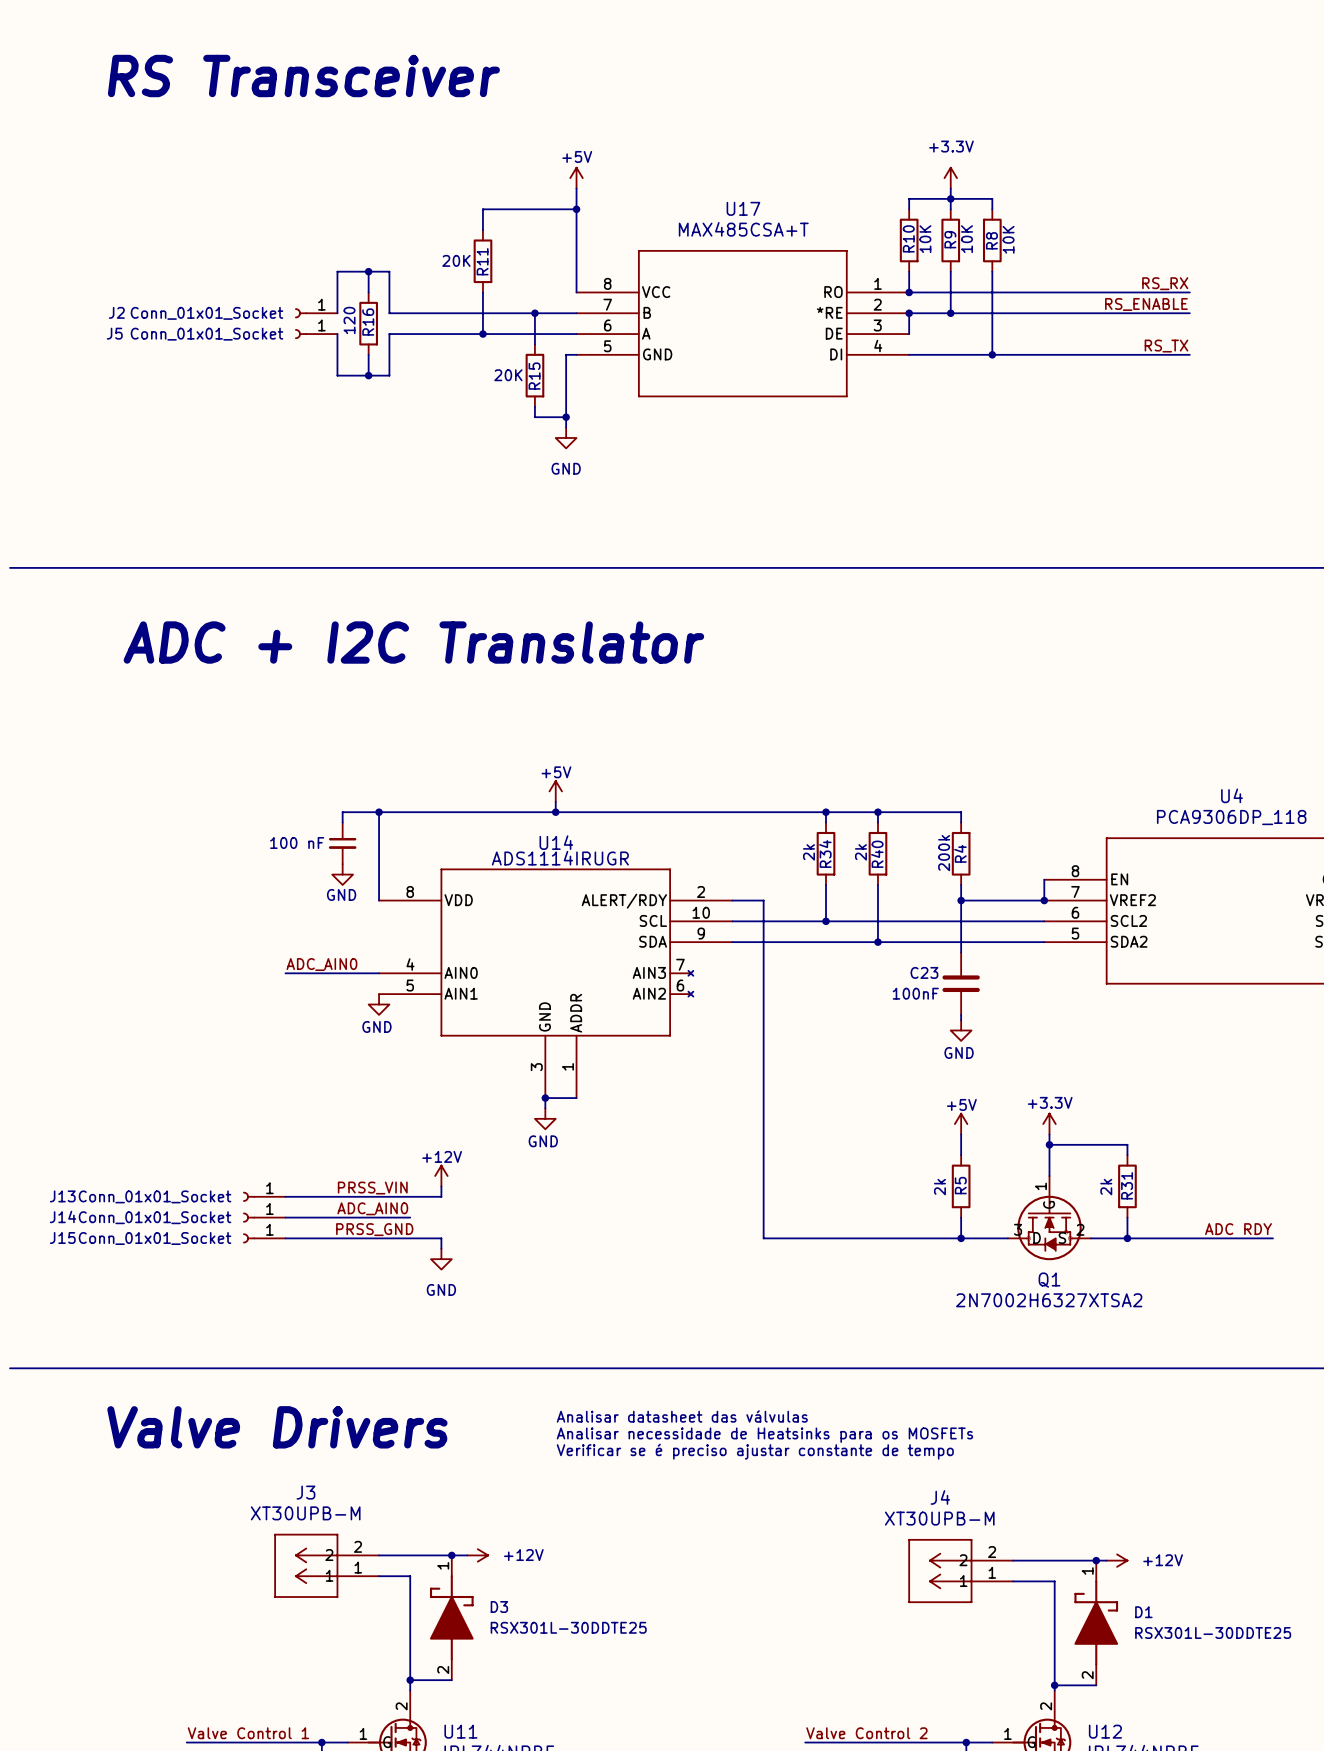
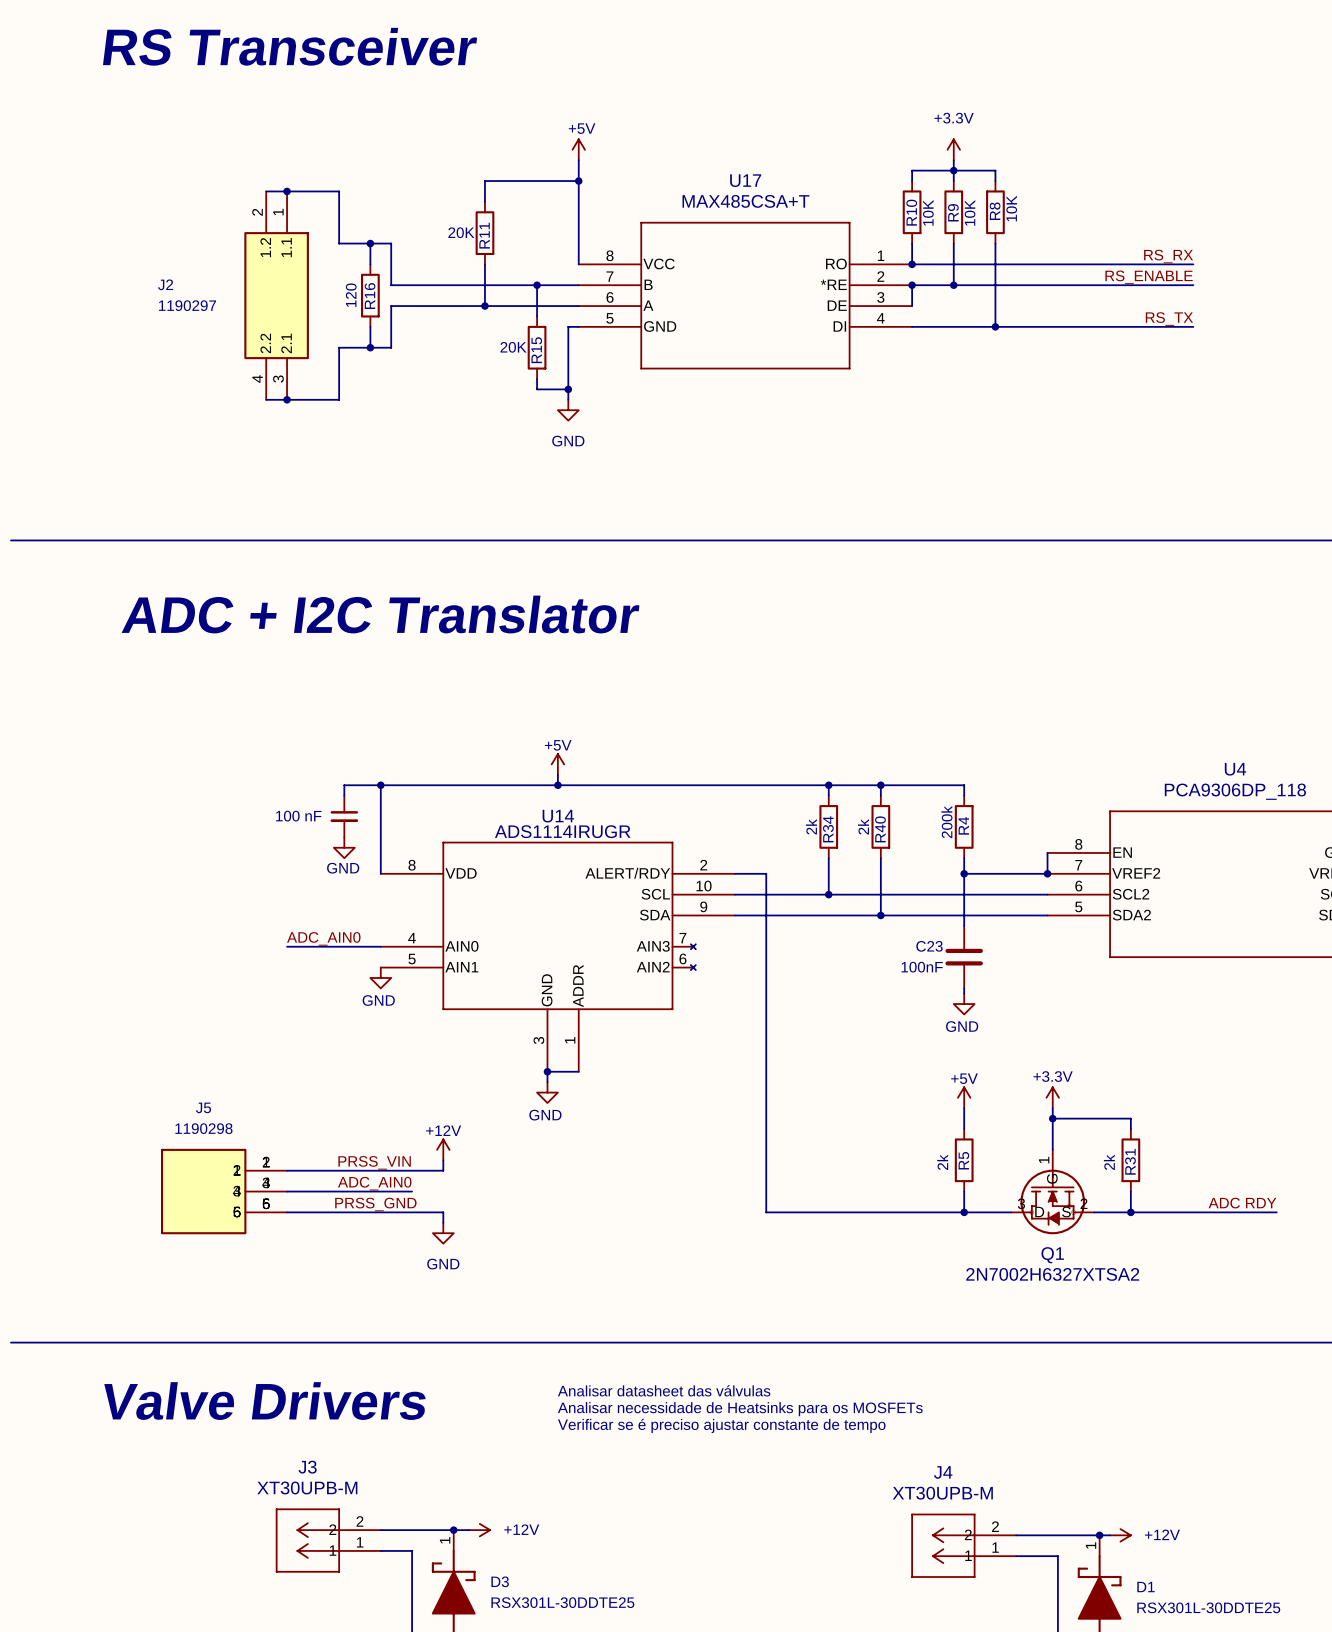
junction: none -> (287, 191)
wire: (337, 271) (337, 313) -> (339, 243) (339, 191) (266, 191)
J2 symbol: [295, 308, 338, 319] -> [244, 191, 309, 400]
J2 name position: J2 (116, 312) -> J2 (165, 284)
J2 value: Conn_01x01_Socket (206, 313) -> 1190297 (187, 305)
J5 symbol: [295, 329, 338, 339] -> [160, 1148, 288, 1235]
J5 name position: J5 (114, 333) -> J5 (203, 1107)
J5 value: Conn_01x01_Socket (206, 334) -> 1190298 (203, 1128)
wire: (337, 334) (337, 375) -> (266, 399) (339, 399) (339, 347)
junction: none -> (287, 399)
J13: Conn_01x01_Socket (264, 1196) -> none
J14: Conn_01x01_Socket (264, 1217) -> none
J15: Conn_01x01_Socket (264, 1238) -> none

